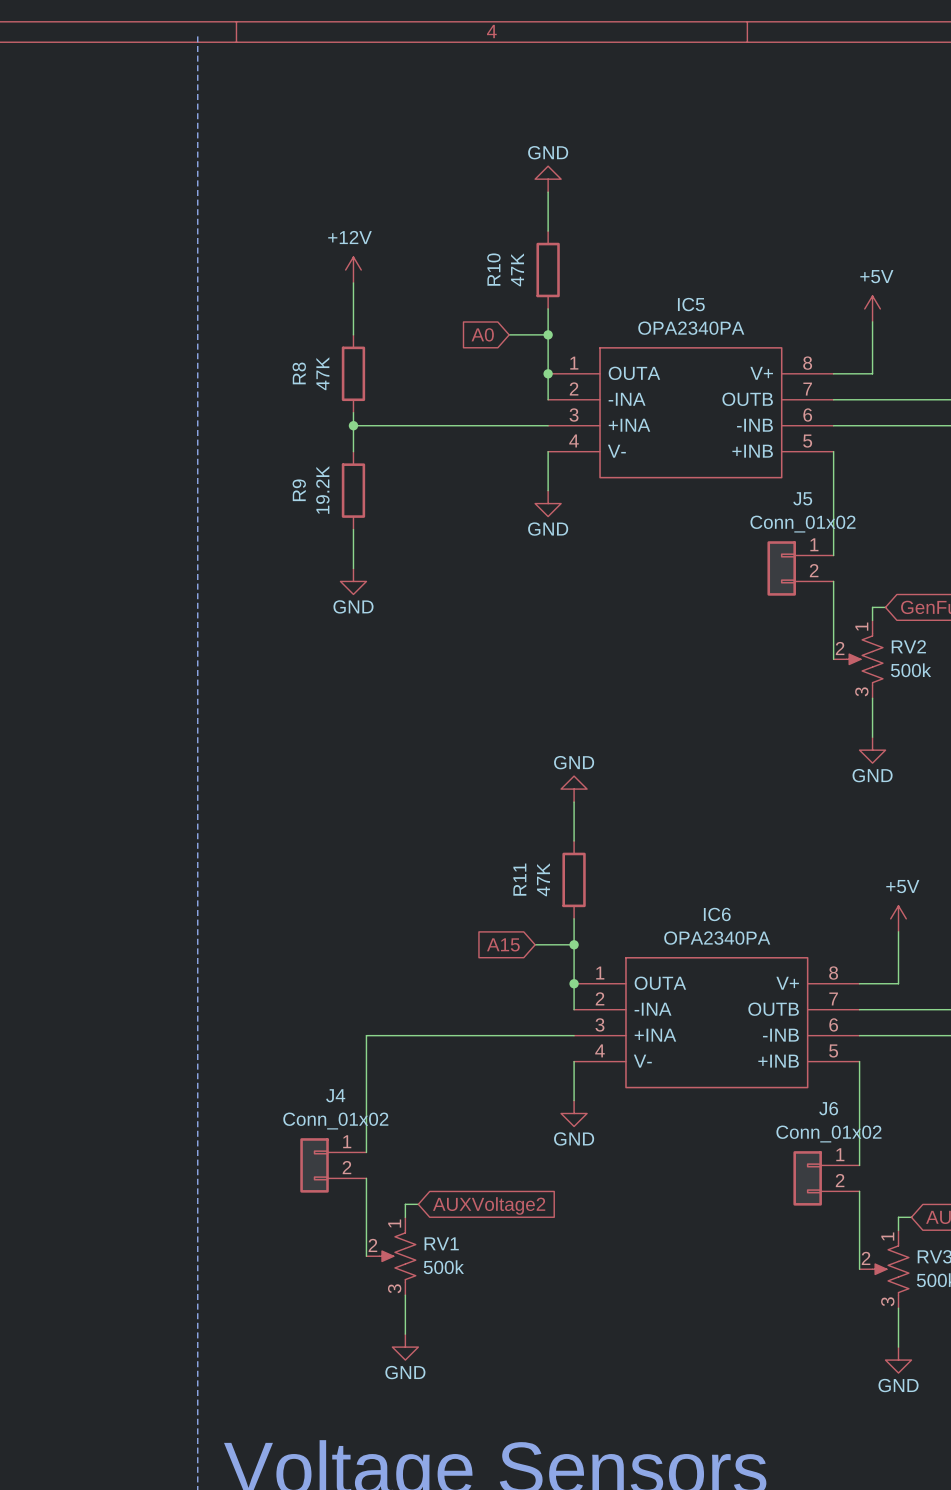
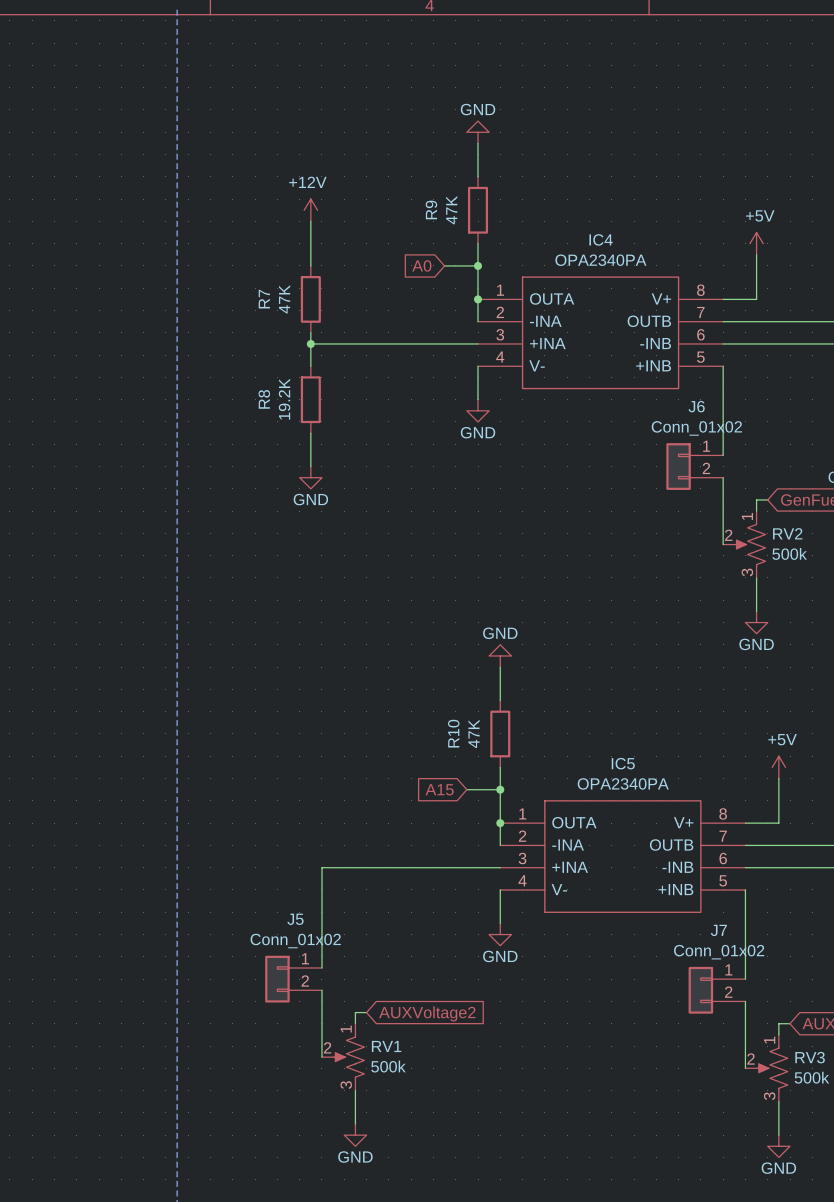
R10 name: R10 (493, 269) -> R9 (431, 209)
IC5 name: IC5 (691, 304) -> IC4 (601, 239)
R8 name: R8 (299, 373) -> R7 (264, 299)
R9 name: R9 (299, 490) -> R8 (264, 399)
J5 name: J5 (802, 498) -> J6 (696, 406)
R11 name: R11 (519, 879) -> R10 (453, 733)
IC6 name: IC6 (717, 914) -> IC5 (623, 763)
J4 name: J4 (335, 1095) -> J5 (295, 919)
J6 name: J6 (828, 1108) -> J7 (718, 930)

